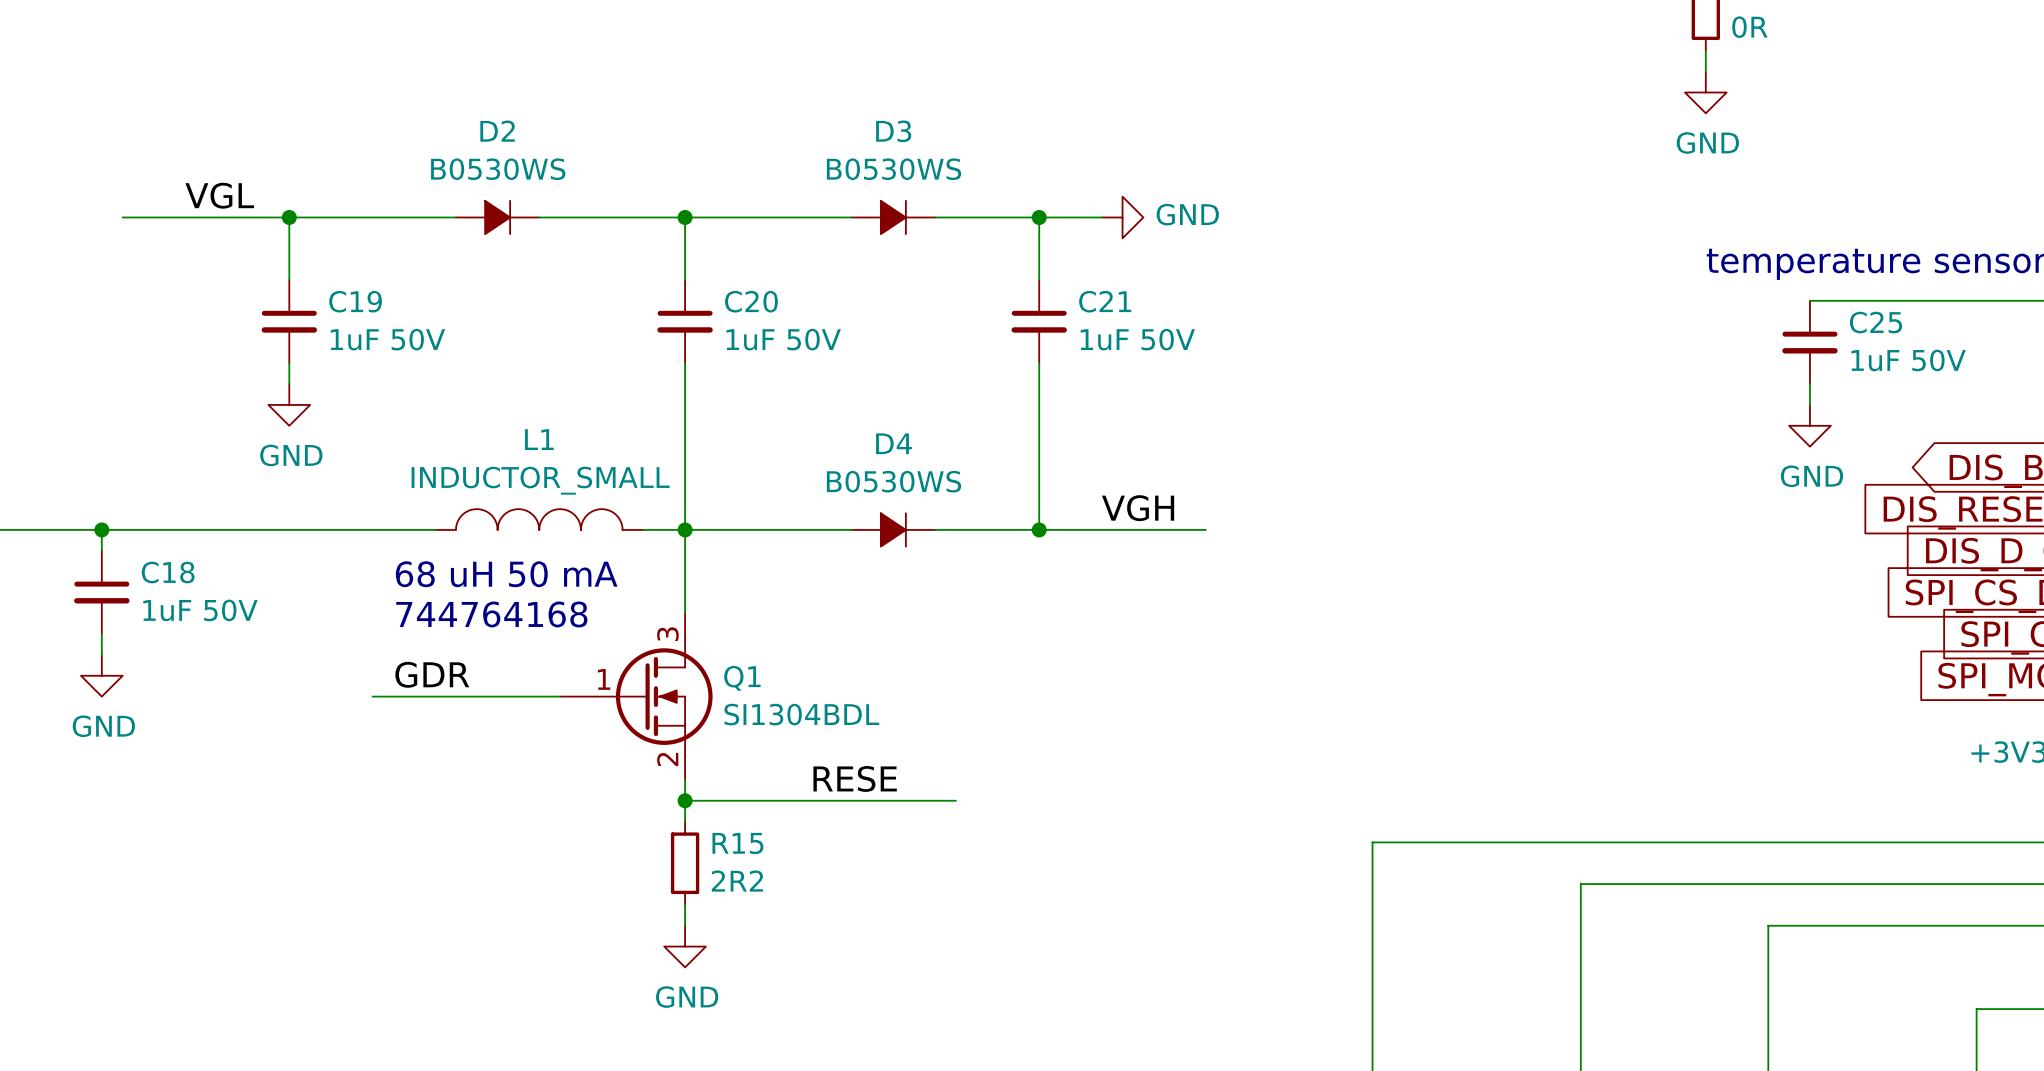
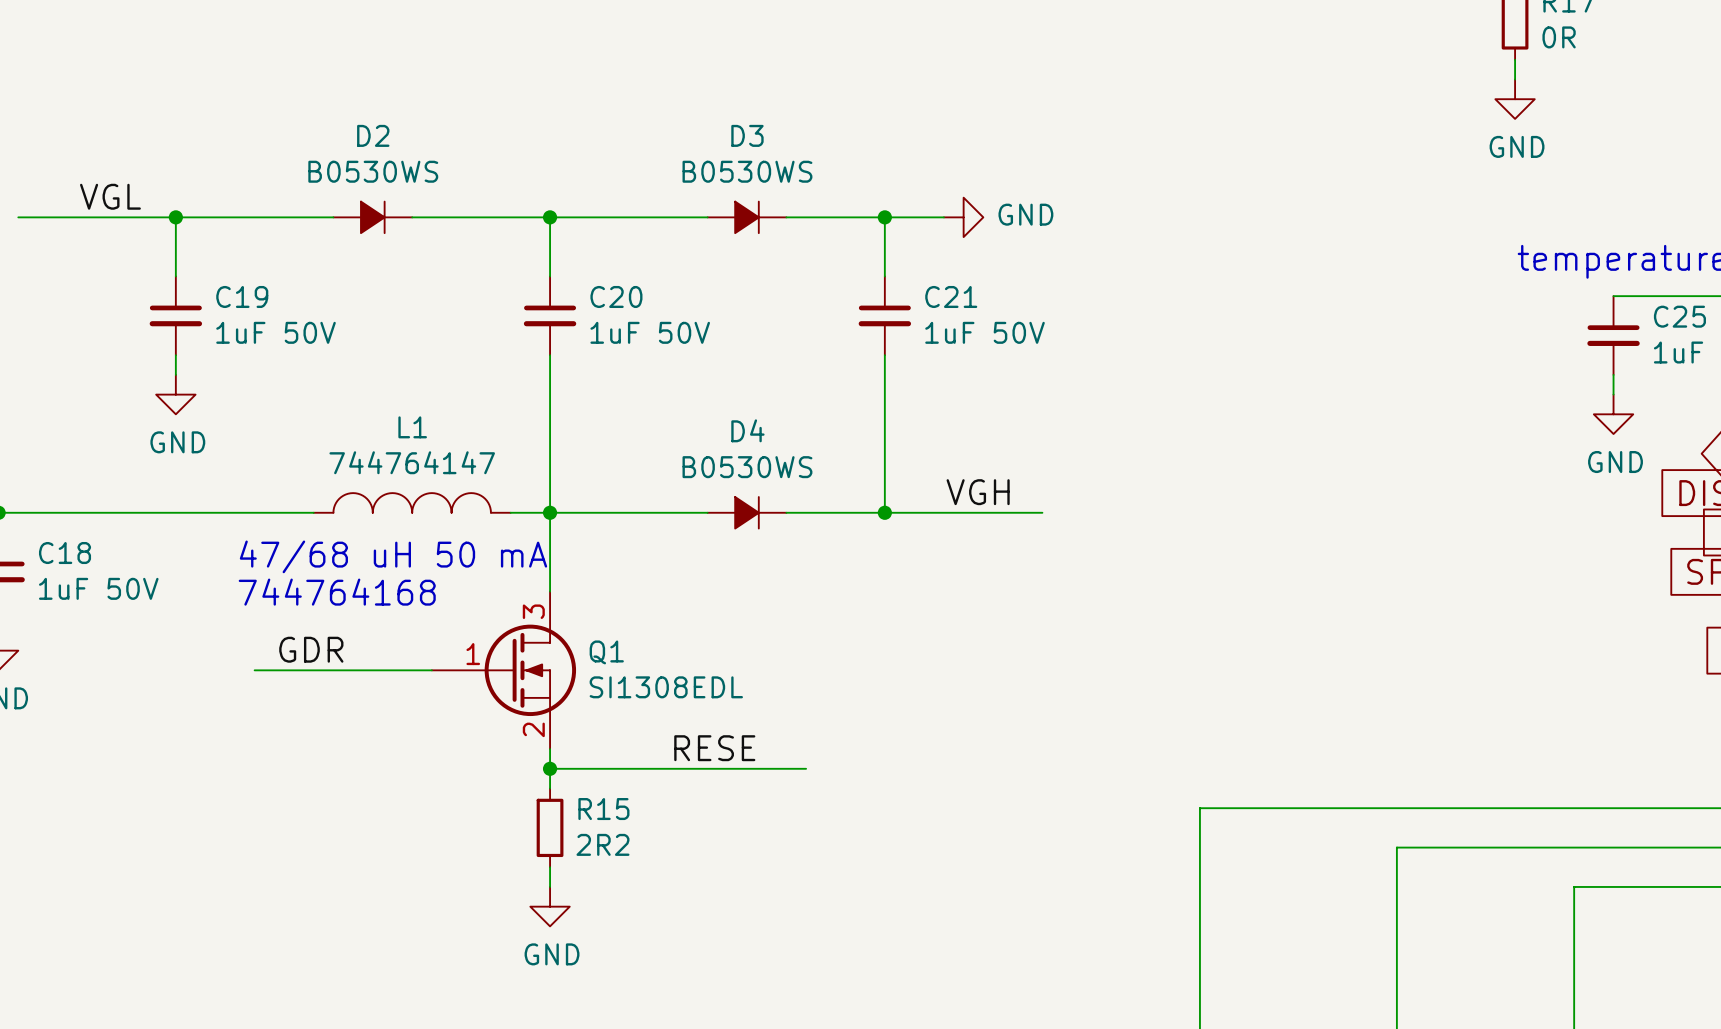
L1 value: INDUCTOR_SMALL (540, 480) -> 744764147 (412, 462)
text: 68 uH 50 mA (506, 574) -> 47/68 uH 50 mA (393, 556)
text position: 744764168 (491, 614) -> 744764168 (337, 592)
Q1 value: SI1304BDL (801, 714) -> SI1308EDL (666, 687)

